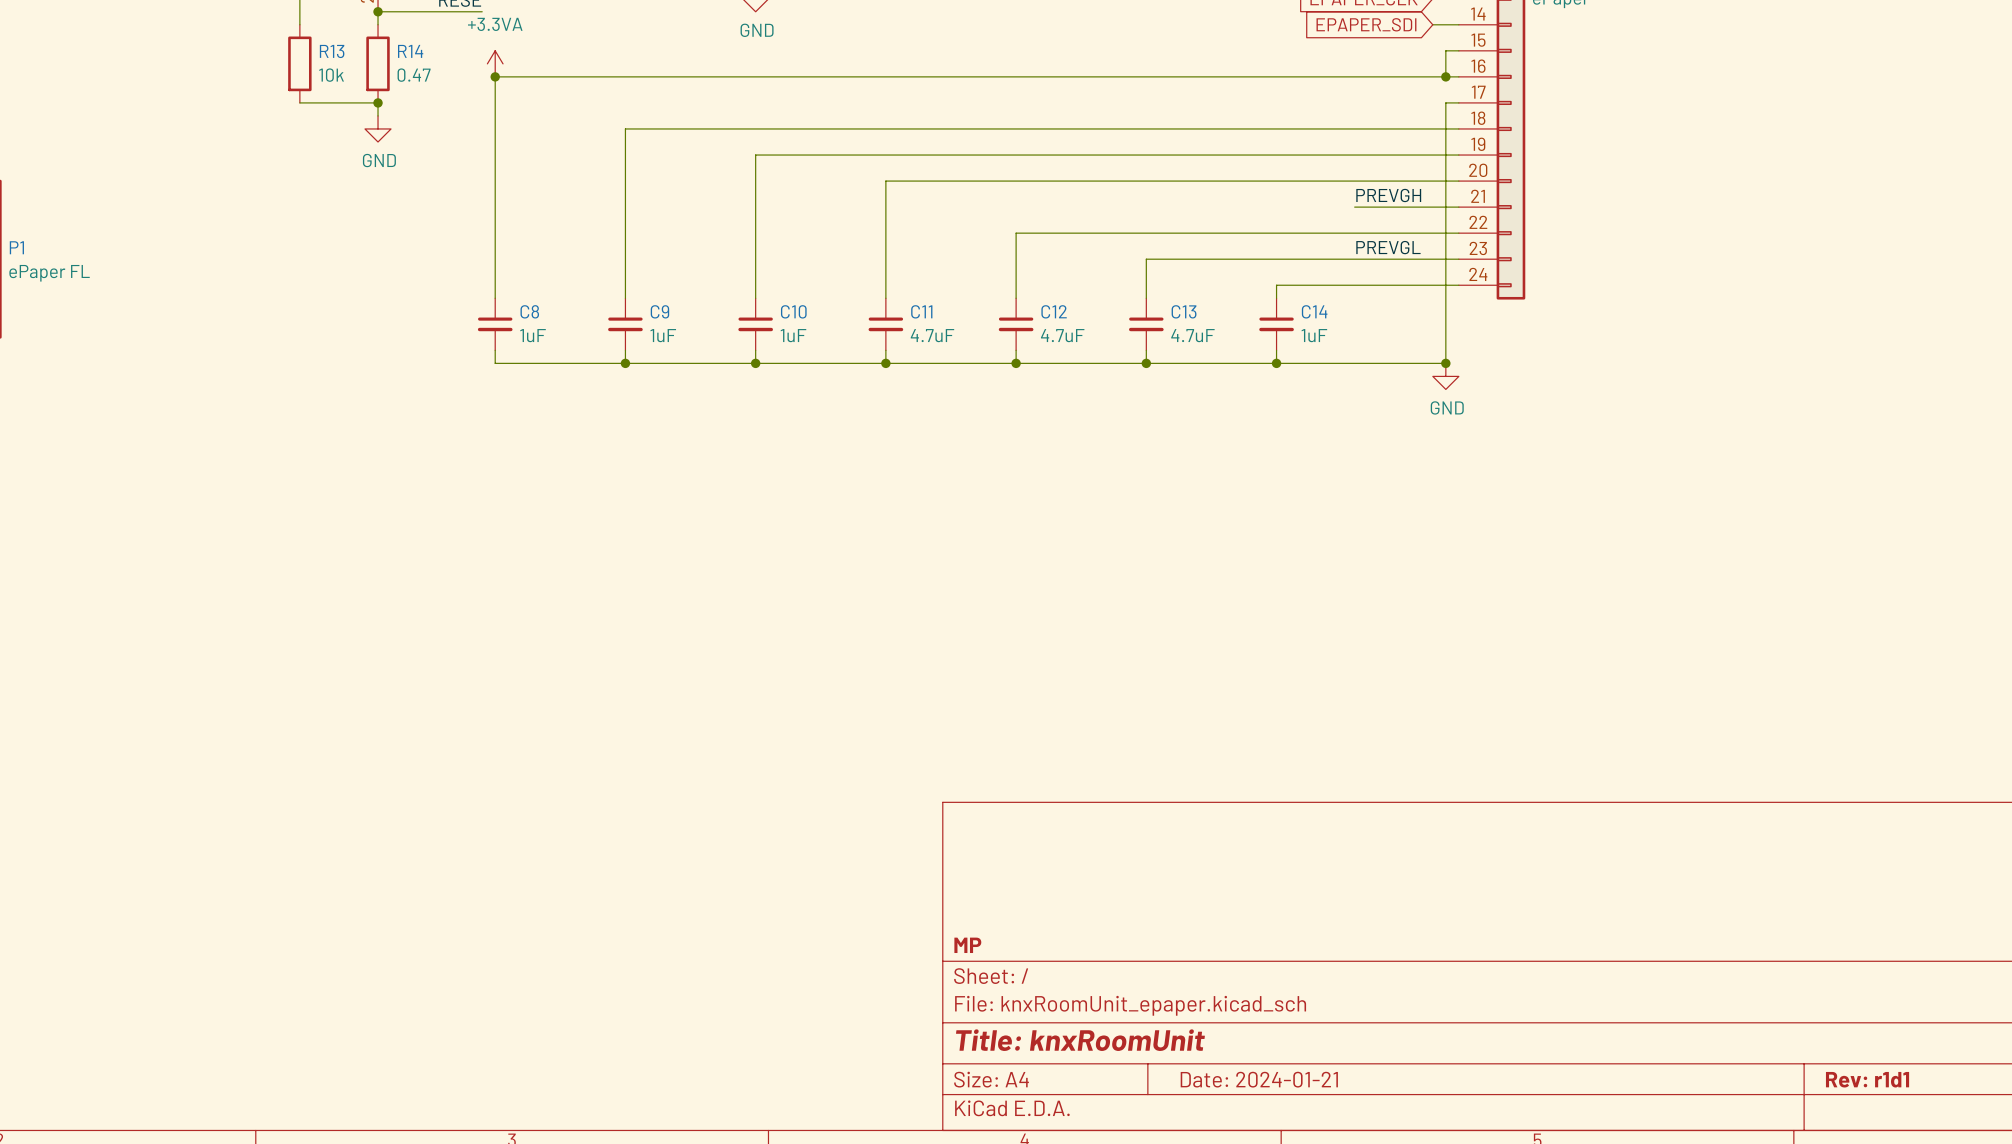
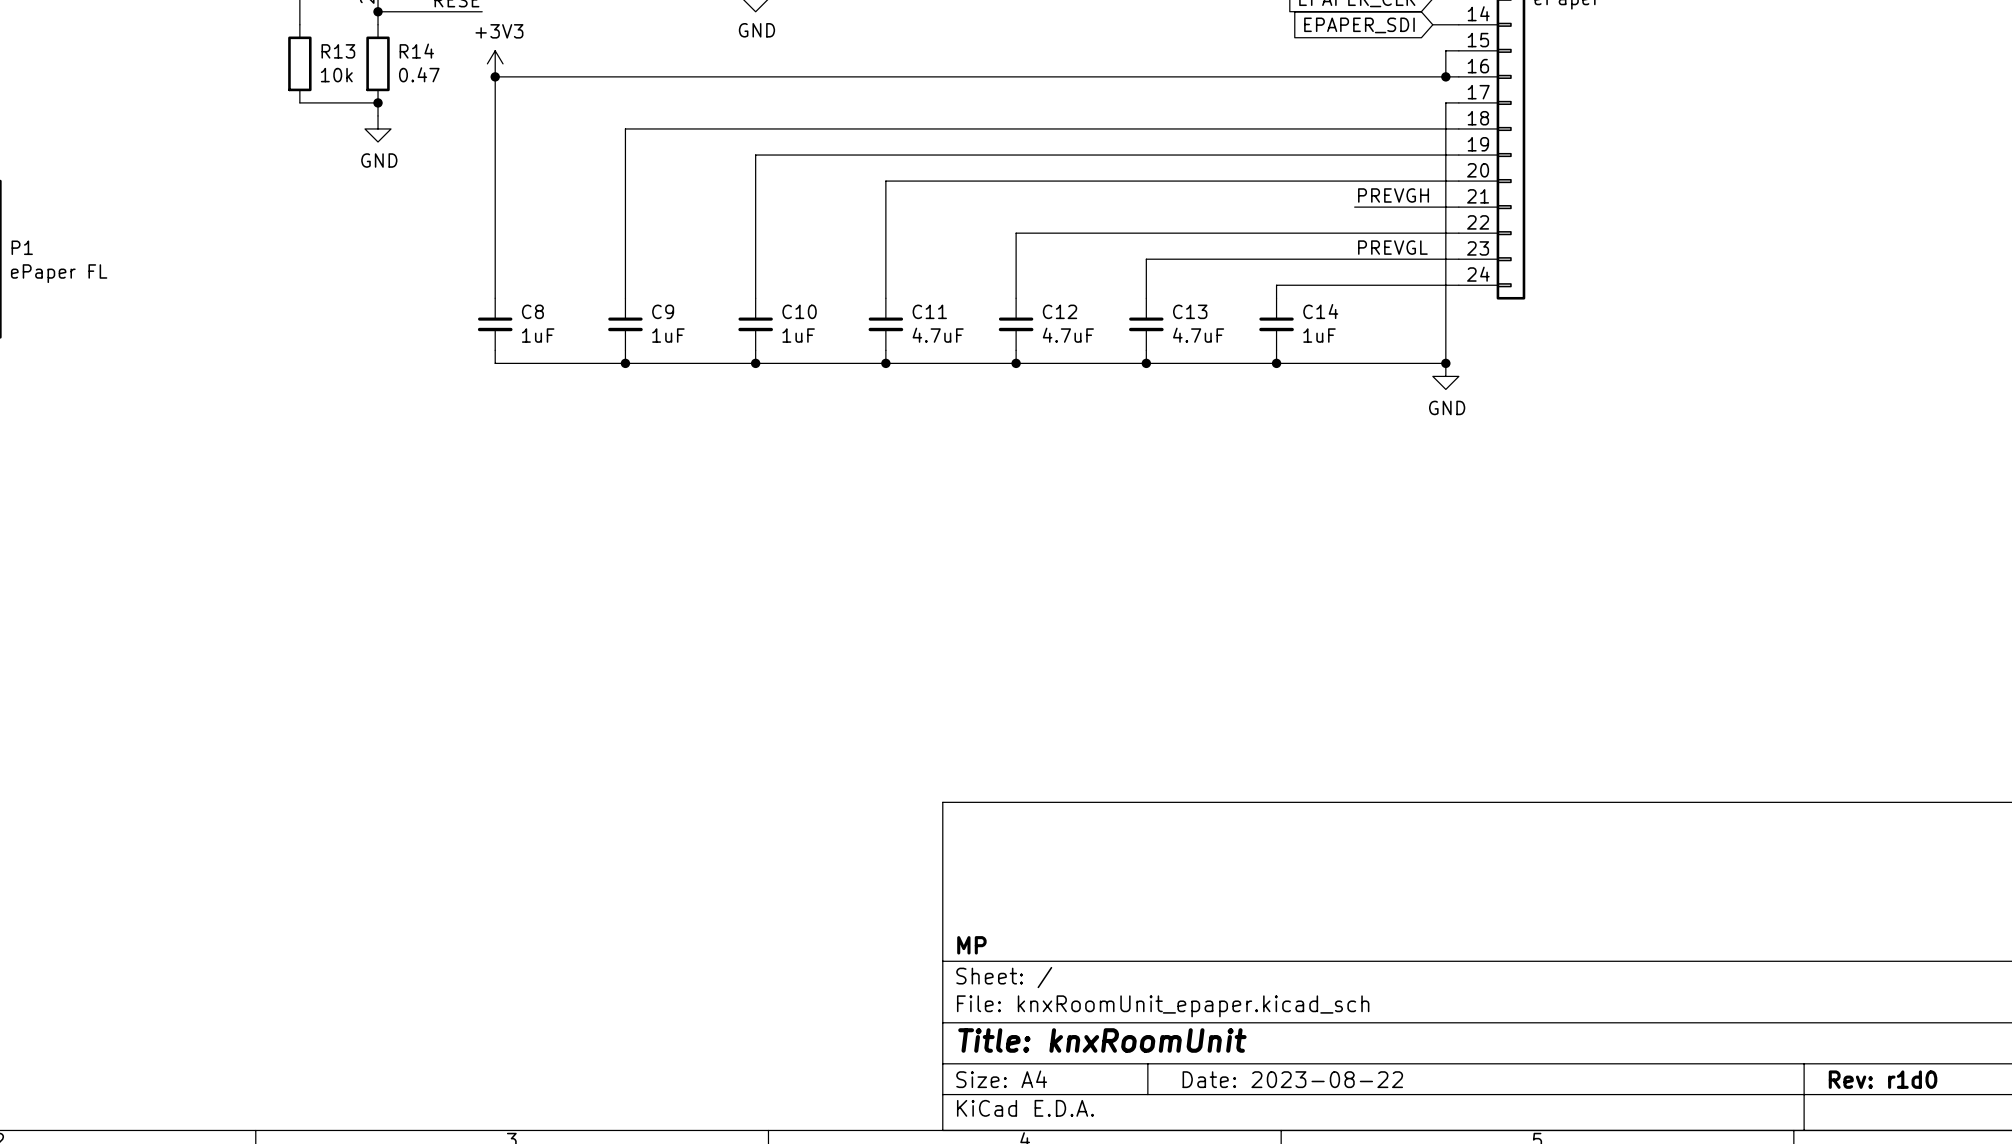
power symbol: +3.3VA (495, 63) -> +3V3 (495, 63)
title block: Date: 2024-01-21 (1259, 1079) -> Date: 2023-08-22 (1292, 1079)
title block: Rev: r1d1 (1867, 1079) -> Rev: r1d0 (1883, 1079)

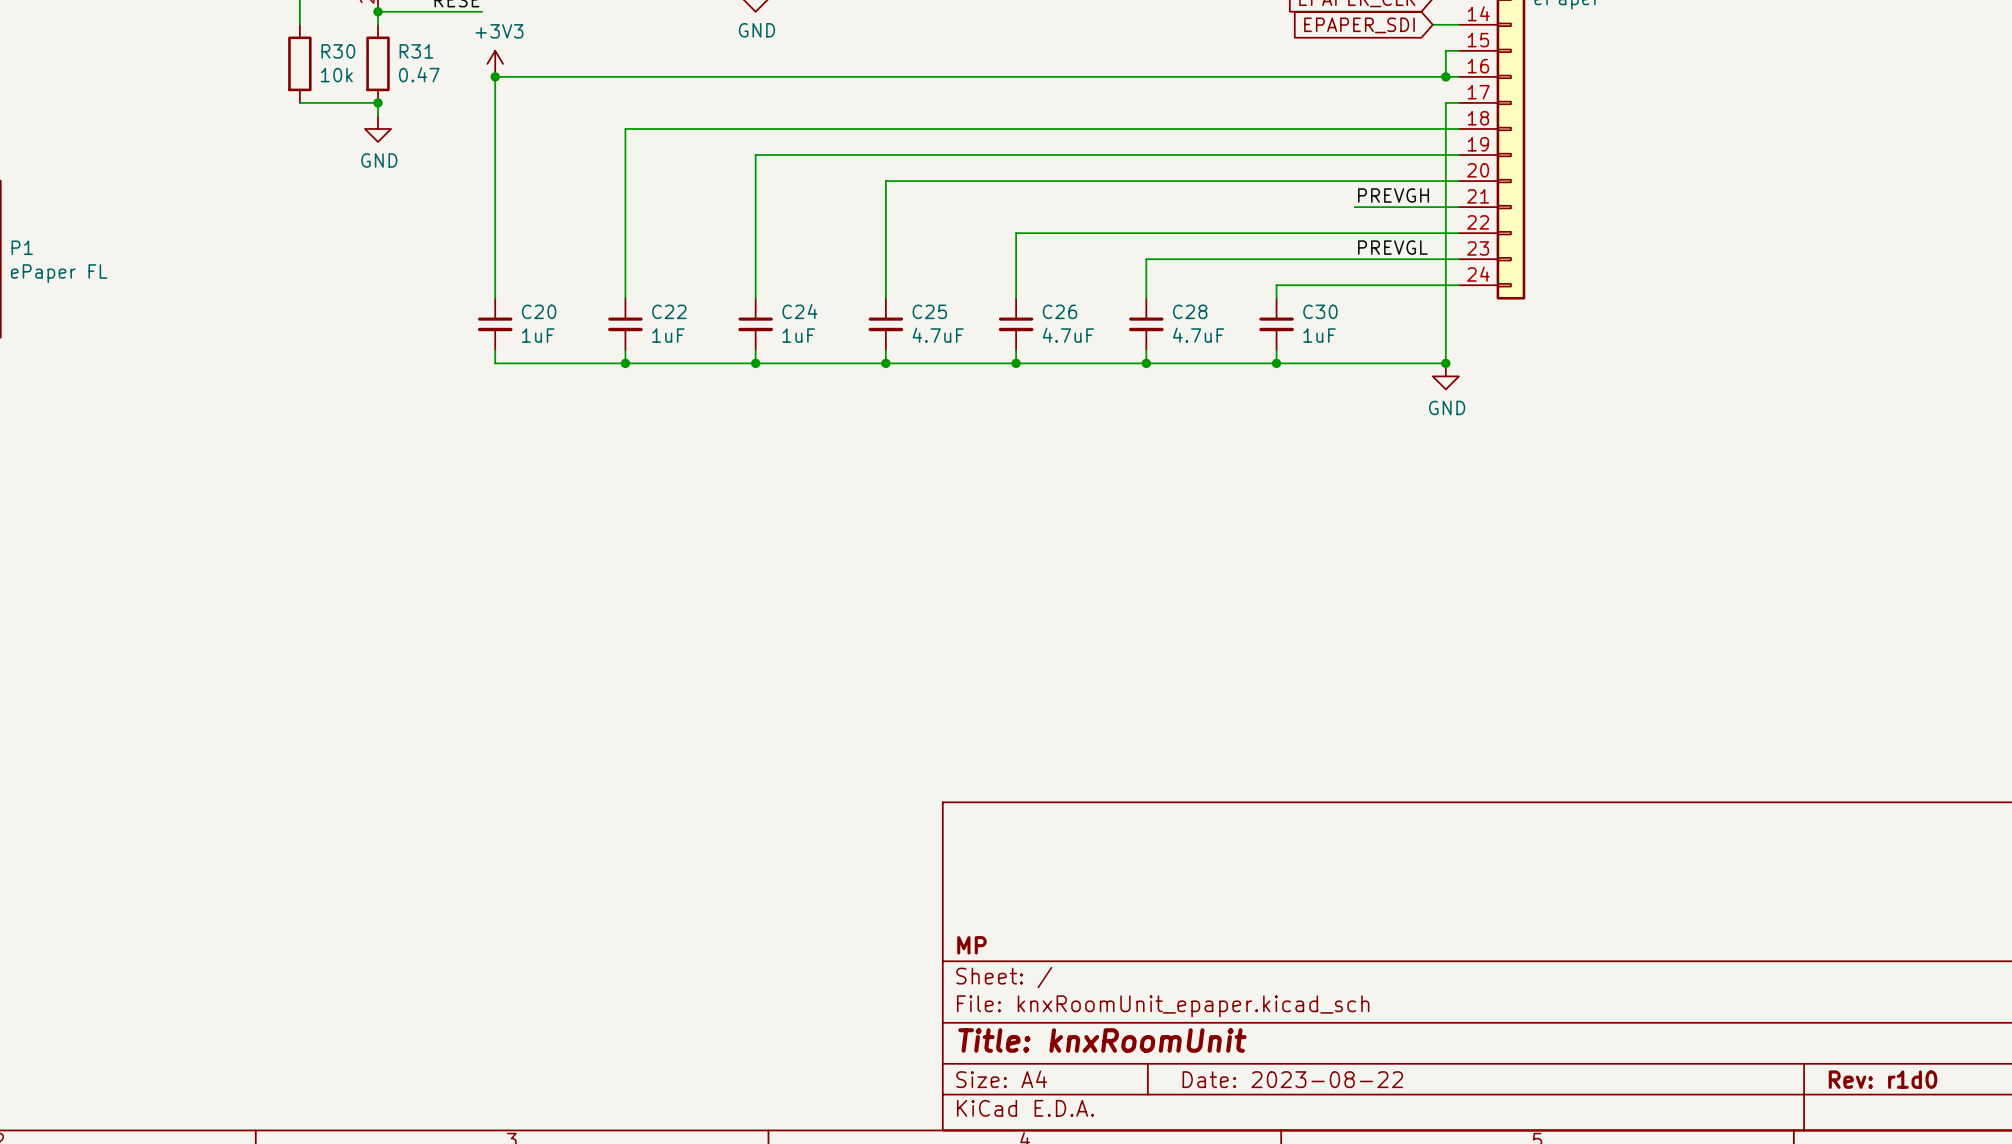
R13 name: R13 (338, 51) -> R30 (338, 51)
R14 name: R14 (416, 51) -> R31 (416, 51)
C8 name: C8 (532, 311) -> C20 (539, 311)
C9 name: C9 (663, 311) -> C22 (669, 311)
C10 name: C10 (799, 311) -> C24 (799, 311)
C11 name: C11 (929, 311) -> C25 (929, 311)
C12 name: C12 (1060, 311) -> C26 (1060, 311)
C13 name: C13 (1190, 311) -> C28 (1190, 311)
C14 name: C14 (1320, 311) -> C30 (1320, 311)

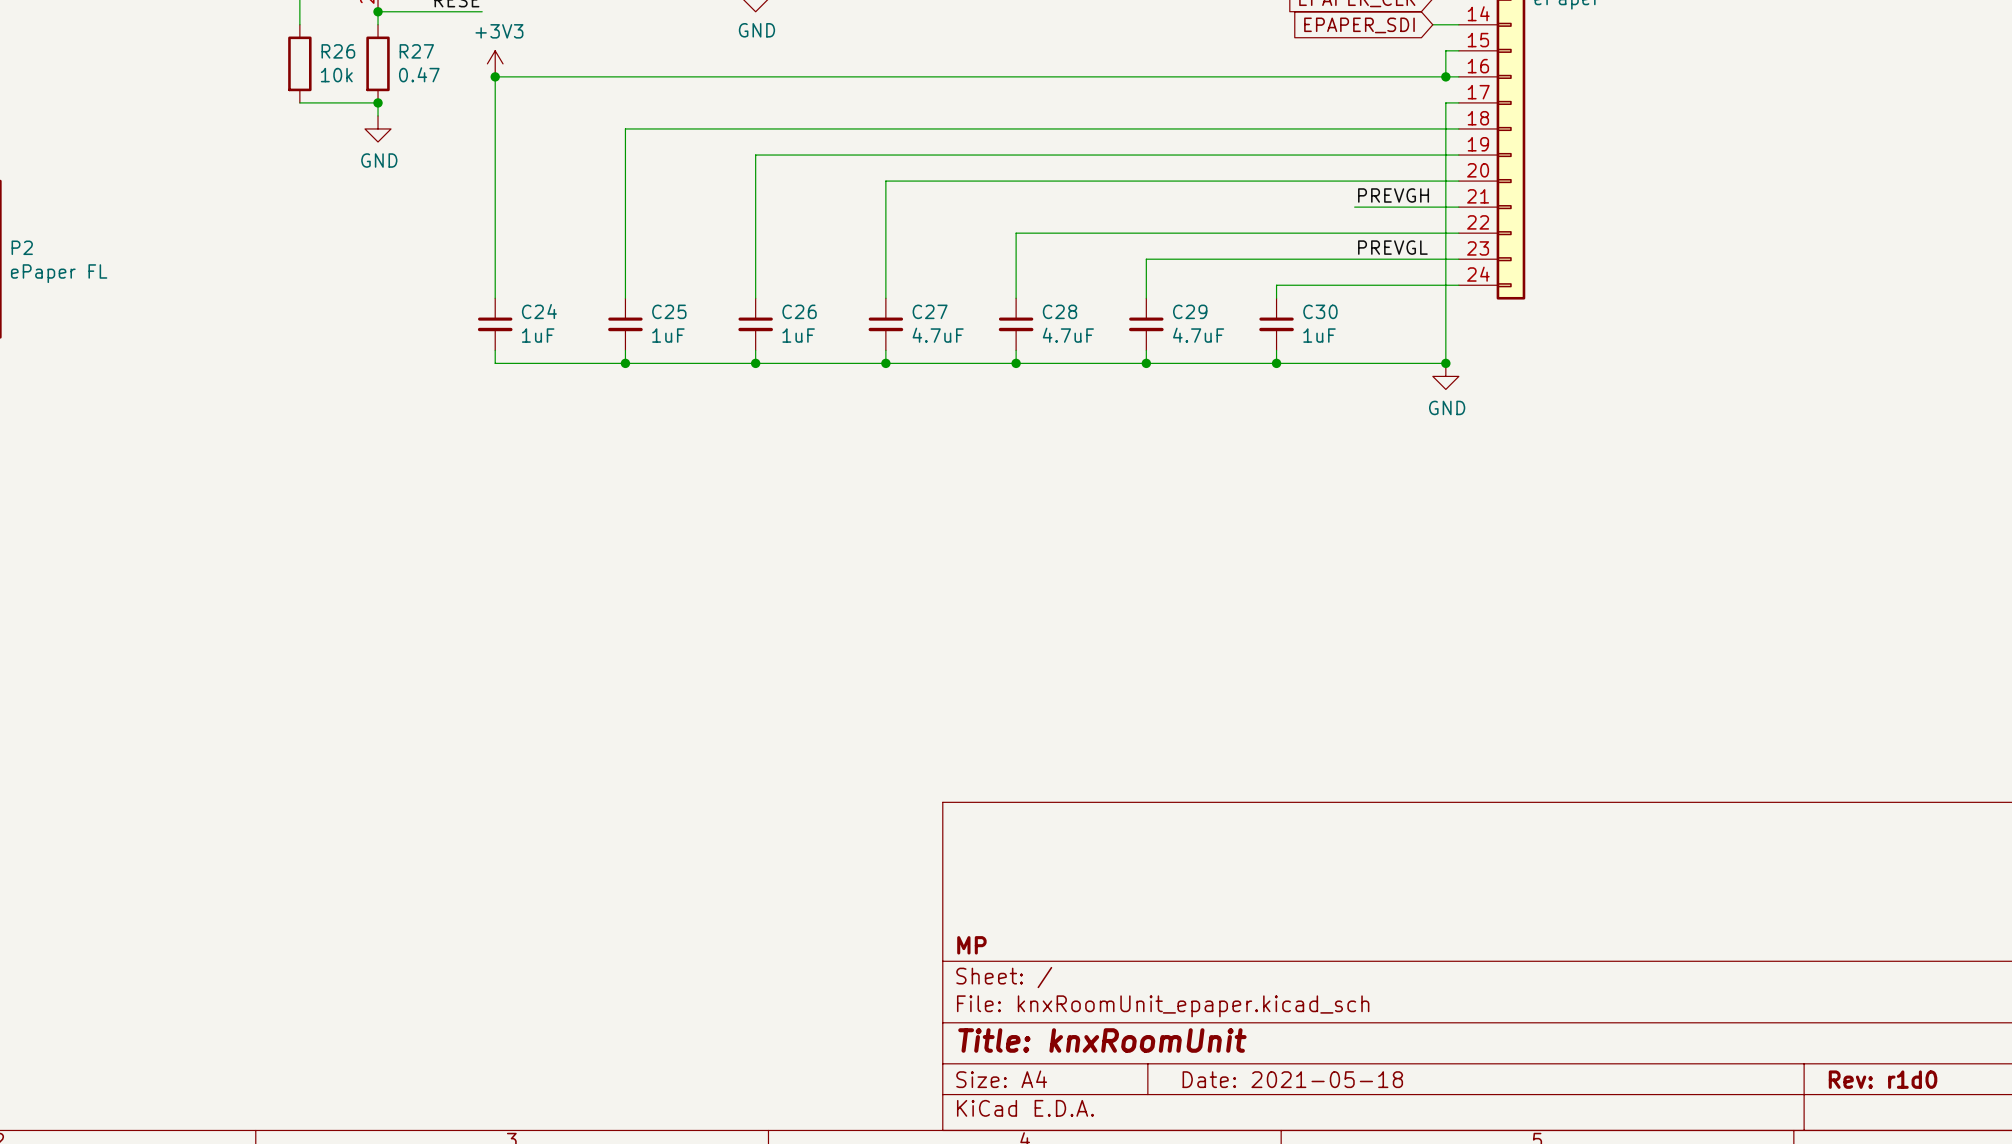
R30 name: R30 (338, 51) -> R26 (338, 51)
R31 name: R31 (416, 51) -> R27 (416, 51)
P1 name: P1 (22, 247) -> P2 (22, 247)
C20 name: C20 (539, 311) -> C24 (539, 311)
C22 name: C22 (669, 311) -> C25 (669, 311)
C24 name: C24 (799, 311) -> C26 (799, 311)
C25 name: C25 (929, 311) -> C27 (930, 311)
C26 name: C26 (1060, 311) -> C28 (1060, 311)
C28 name: C28 (1190, 311) -> C29 (1190, 311)
title block: Date: 2023-08-22 (1292, 1079) -> Date: 2021-05-18 (1292, 1079)

